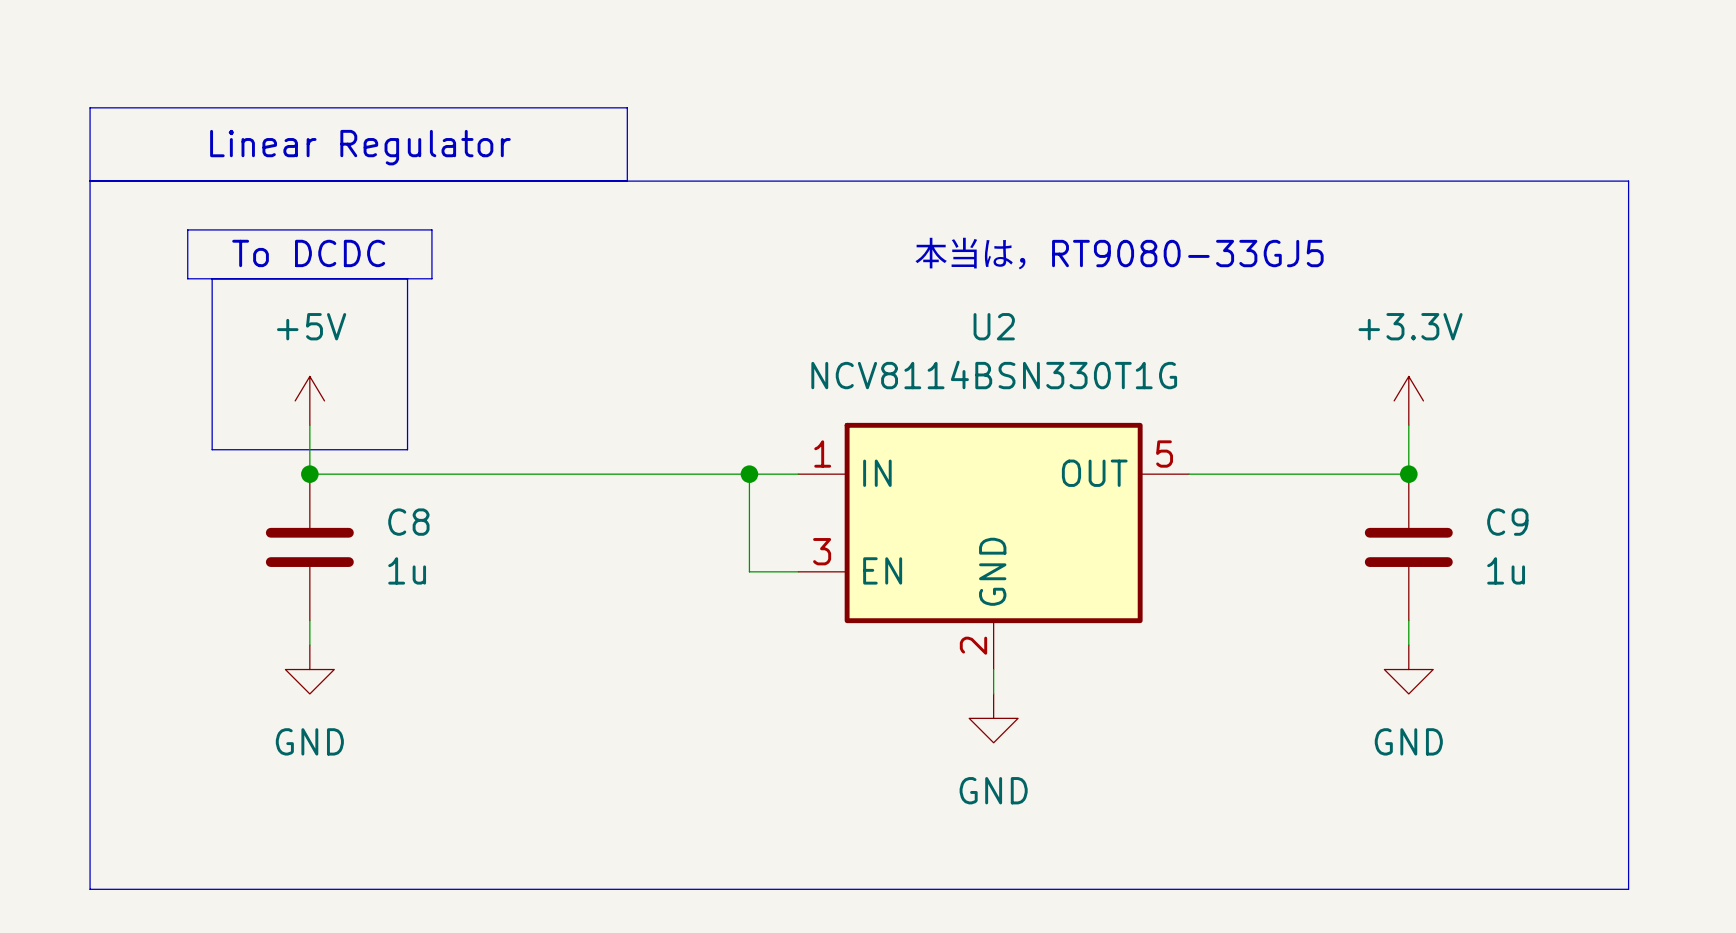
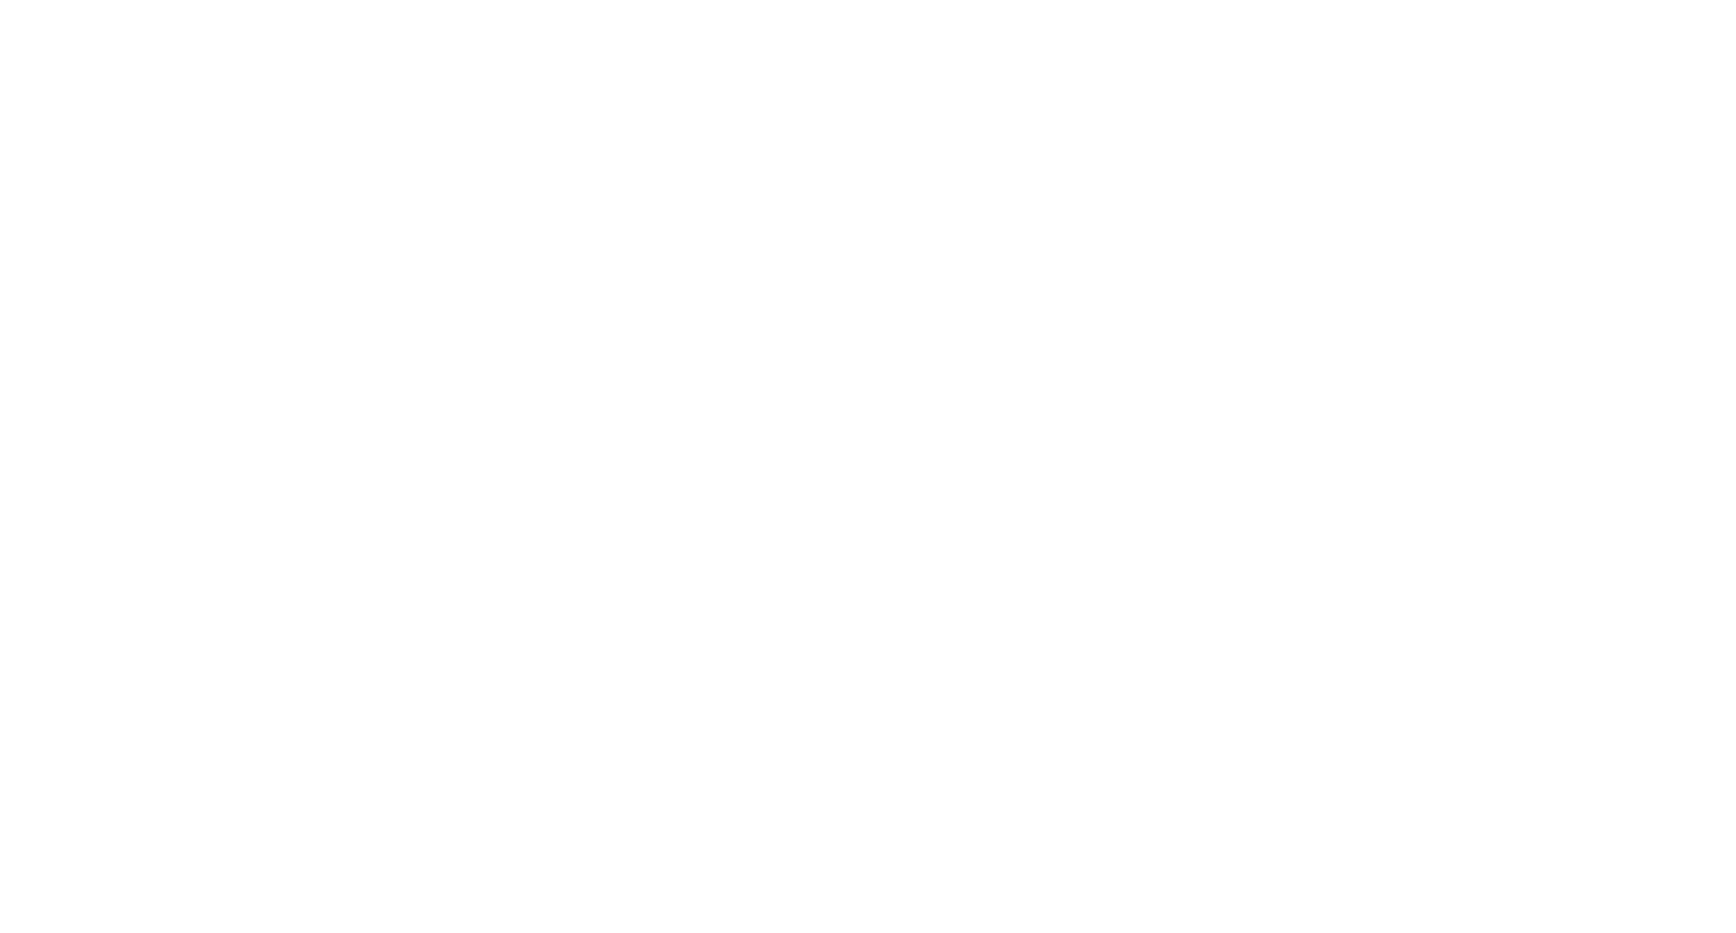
text: Linear Regulator (360, 147) -> none
line: (90, 181) (1628, 181) (1628, 889) (90, 889) (90, 107) (627, 107) (627, 181) -> none
line: (187, 229) (431, 229) (431, 278) (187, 278) (187, 229) -> none
text: To DCDC (308, 253) -> none
text: 本当は，RT9080-33GJ5 (1118, 253) -> none
line: (212, 278) (212, 449) (407, 449) (407, 278) -> none
power symbol: +5V (309, 400) -> none
power symbol: +3.3V (1408, 400) -> none
wire: (309, 425) (309, 474) (798, 474) -> none
wire: (1408, 425) (1408, 474) (1189, 474) -> none
junction: (309, 474) -> none
wire: (749, 474) (749, 571) (798, 571) -> none
junction: (749, 474) -> none
junction: (1408, 474) -> none
U2: NCV8114BSN330T1G (993, 546) -> none
C8: 1u (309, 547) -> none
C9: 1u (1408, 547) -> none
wire: (309, 620) (309, 645) -> none
wire: (1408, 620) (1408, 645) -> none
power symbol: GND (309, 669) -> none
wire: (993, 669) (993, 693) -> none
power symbol: GND (1408, 669) -> none
power symbol: GND (993, 718) -> none

